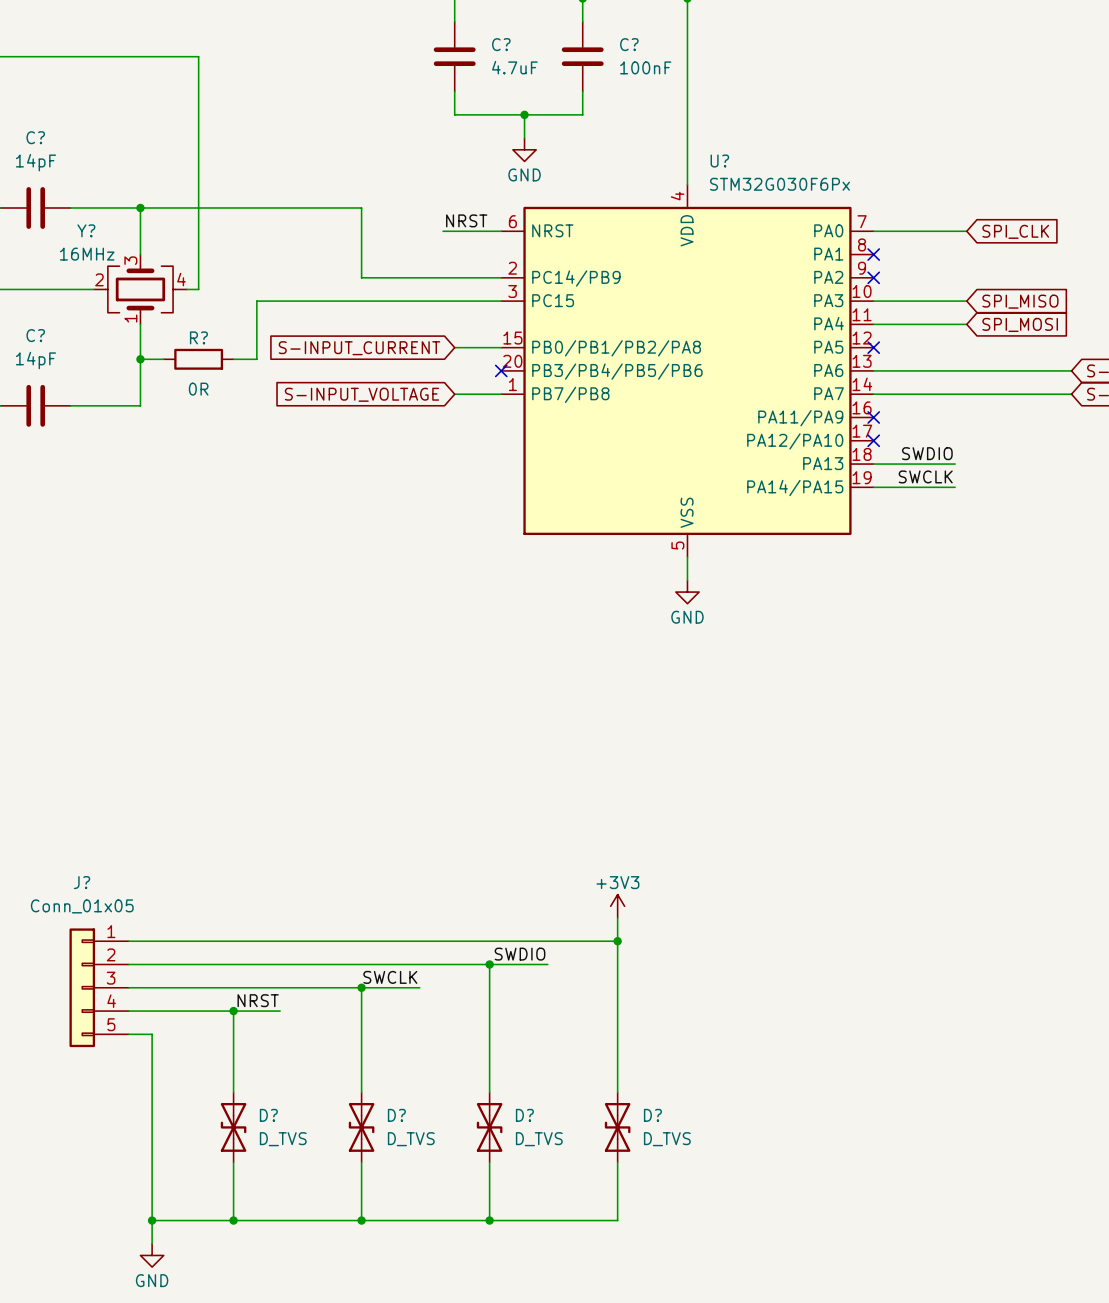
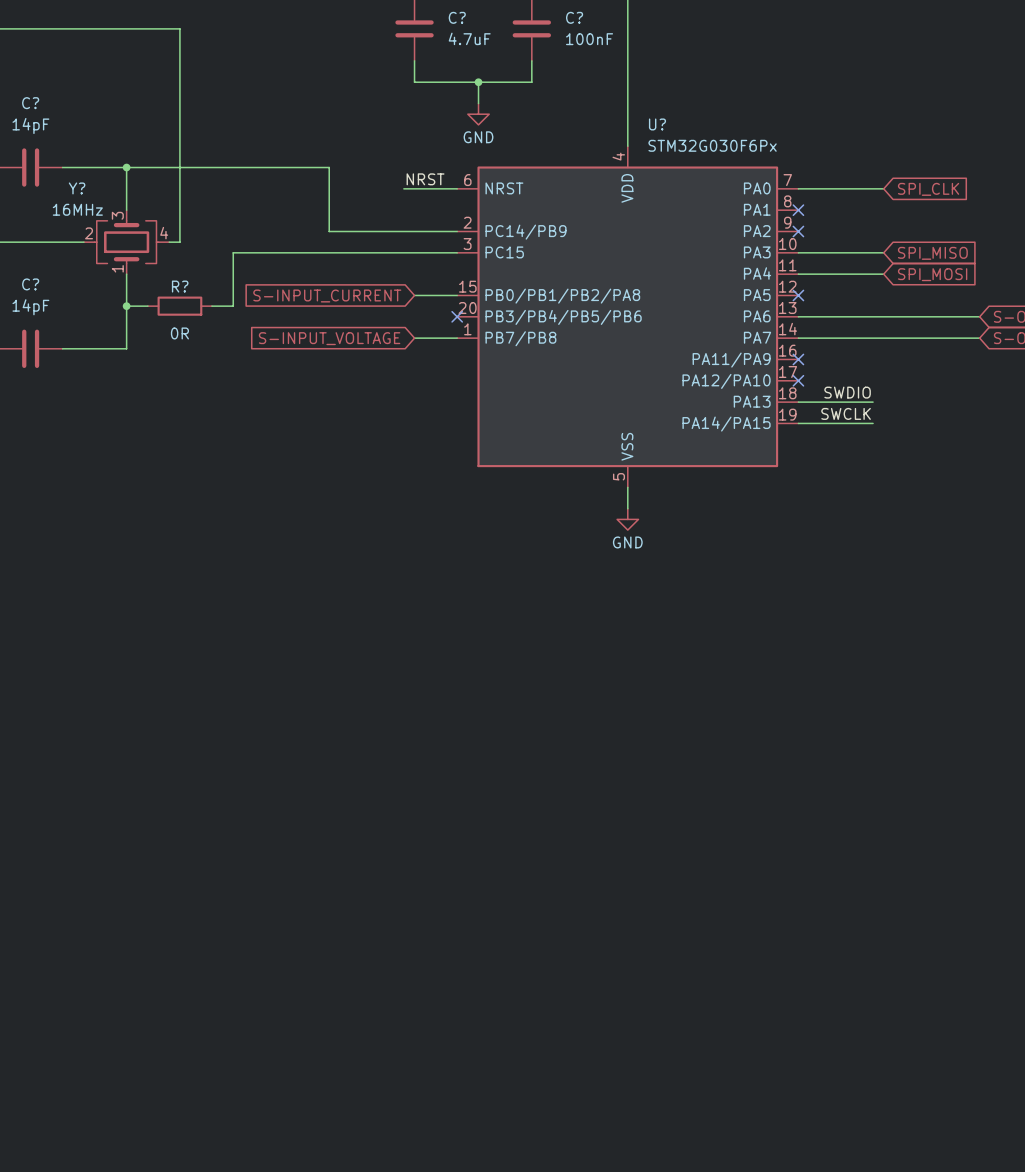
power symbol: +3V3 (617, 906) -> none
wire: (617, 917) (617, 1092) -> none
wire: (128, 941) (617, 941) -> none
junction: (617, 941) -> none
label: SWDIO (520, 954) -> none
wire: (128, 964) (547, 964) -> none
wire: (489, 964) (489, 1092) -> none
junction: (489, 964) -> none
label: SWCLK (390, 977) -> none
J?: Conn_01x05 (99, 987) -> none
wire: (128, 987) (419, 987) -> none
wire: (361, 987) (361, 1092) -> none
junction: (361, 987) -> none
label: NRST (258, 1000) -> none
wire: (128, 1011) (280, 1011) -> none
wire: (233, 1011) (233, 1092) -> none
junction: (233, 1011) -> none
wire: (128, 1034) (152, 1034) (152, 1243) -> none
D?: D_TVS (233, 1127) -> none
D?: D_TVS (361, 1127) -> none
D?: D_TVS (489, 1127) -> none
D?: D_TVS (617, 1127) -> none
wire: (233, 1162) (233, 1220) -> none
wire: (361, 1162) (361, 1220) -> none
wire: (489, 1162) (489, 1220) -> none
wire: (617, 1162) (617, 1220) (152, 1220) -> none
junction: (152, 1220) -> none
junction: (233, 1220) -> none
junction: (361, 1220) -> none
junction: (489, 1220) -> none
power symbol: GND (152, 1255) -> none

